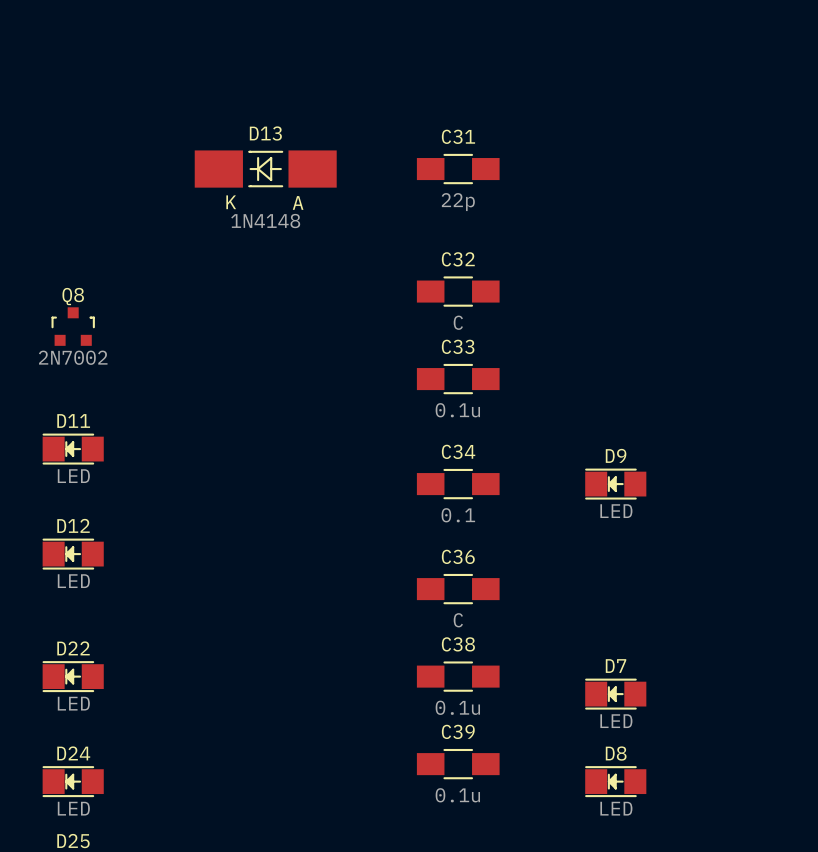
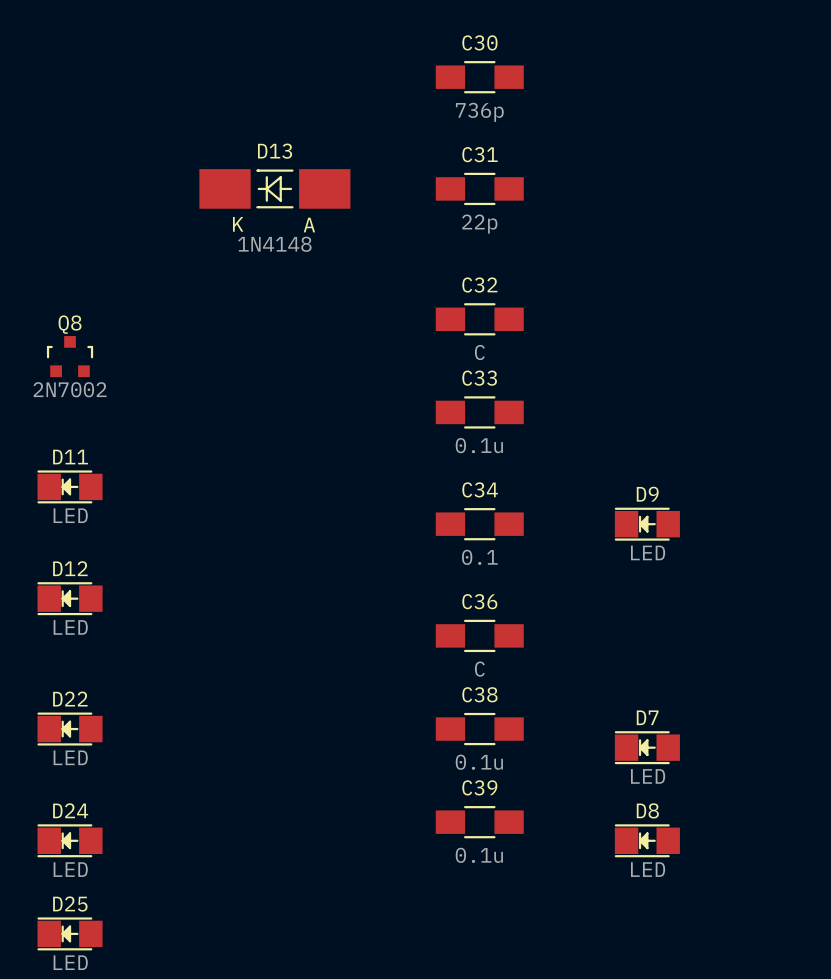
C30: none -> 736p (479, 77)

